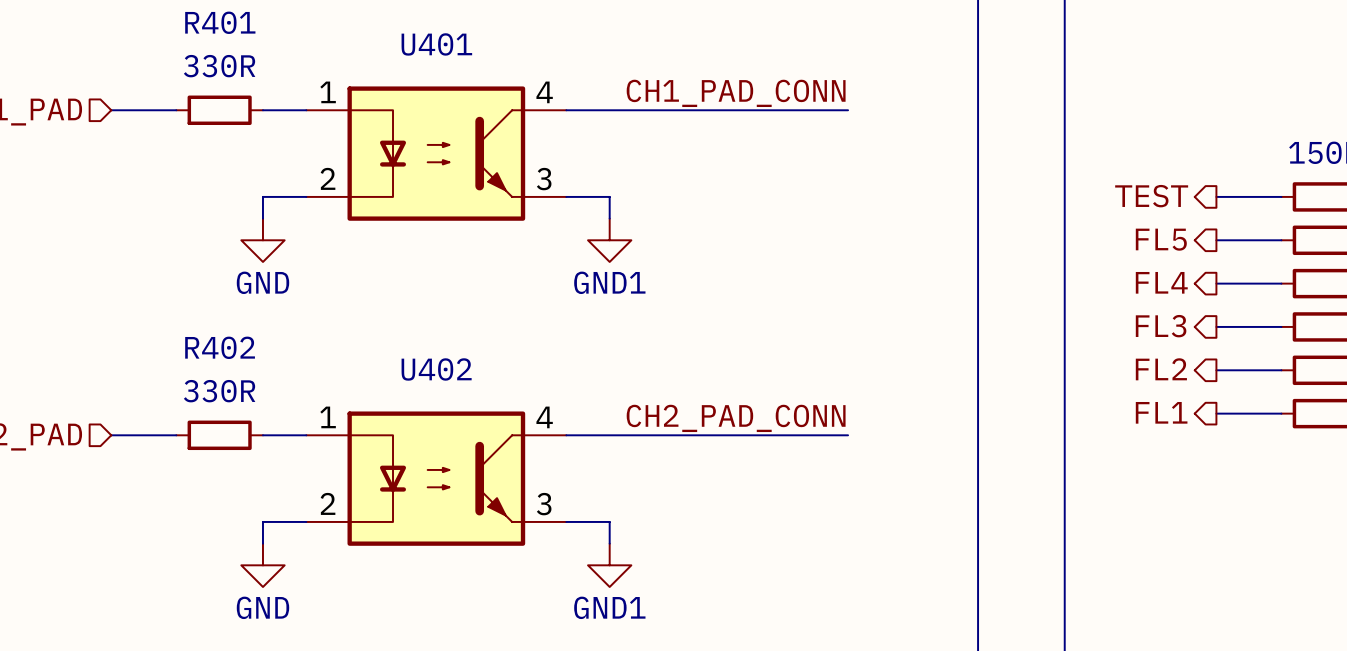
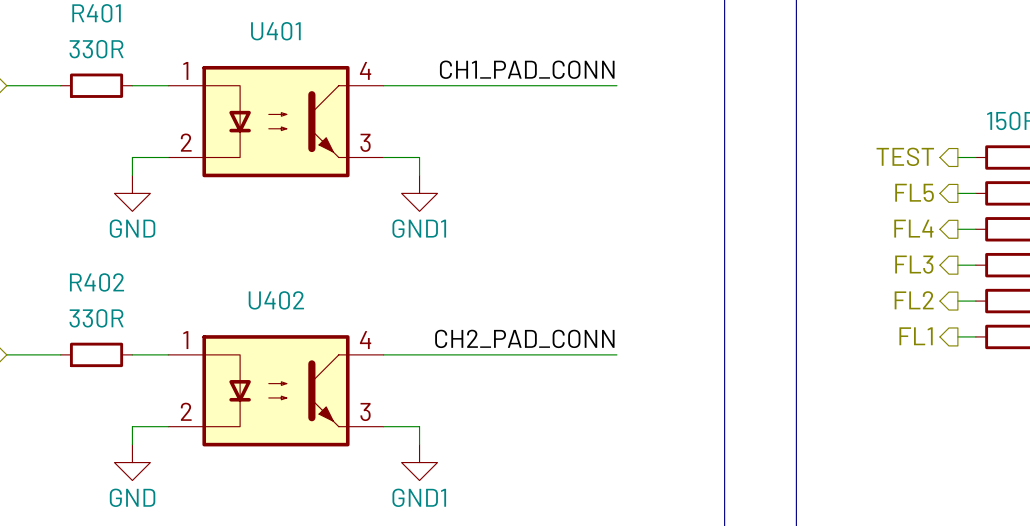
hierarchical label position: TEST (1151, 196) -> TEST (905, 156)
wire: (1216, 196) (1259, 196) -> none
hierarchical label position: FL5 (1161, 239) -> FL5 (914, 192)
wire: (1216, 240) (1259, 240) -> none
hierarchical label position: FL4 (1161, 282) -> FL4 (913, 228)
wire: (1216, 283) (1259, 283) -> none
hierarchical label position: FL3 (1161, 326) -> FL3 (914, 264)
wire: (1216, 326) (1259, 326) -> none
hierarchical label position: FL2 (1161, 369) -> FL2 (914, 300)
wire: (1216, 370) (1259, 370) -> none
hierarchical label position: FL1 (1161, 412) -> FL1 (916, 336)
wire: (1216, 413) (1259, 413) -> none

